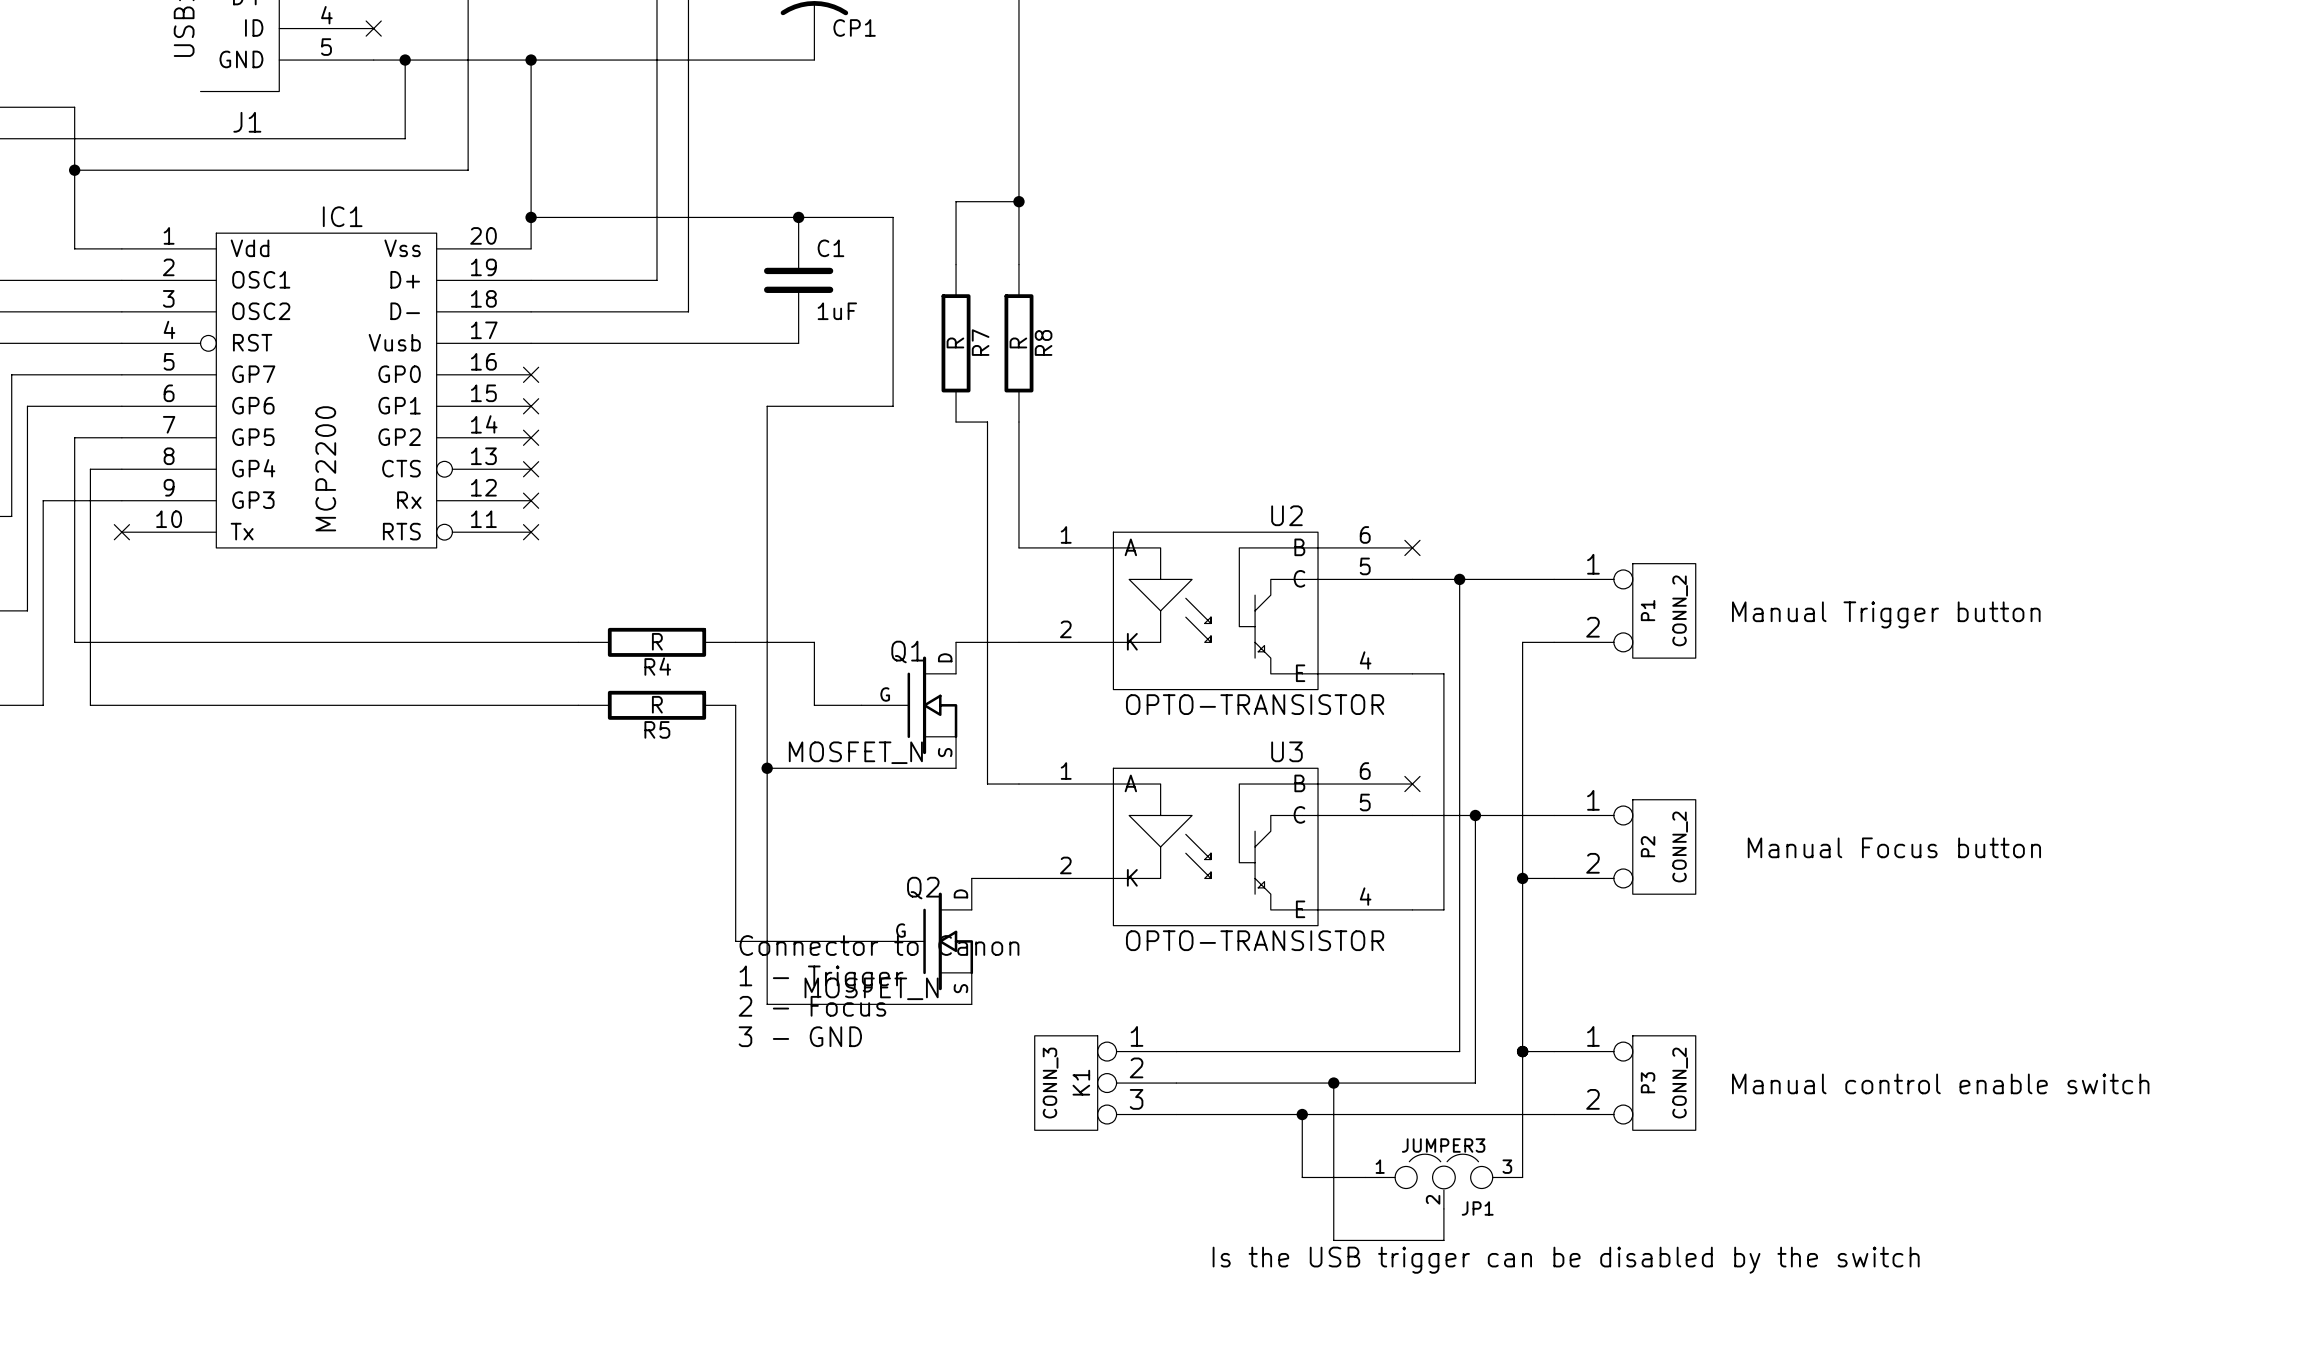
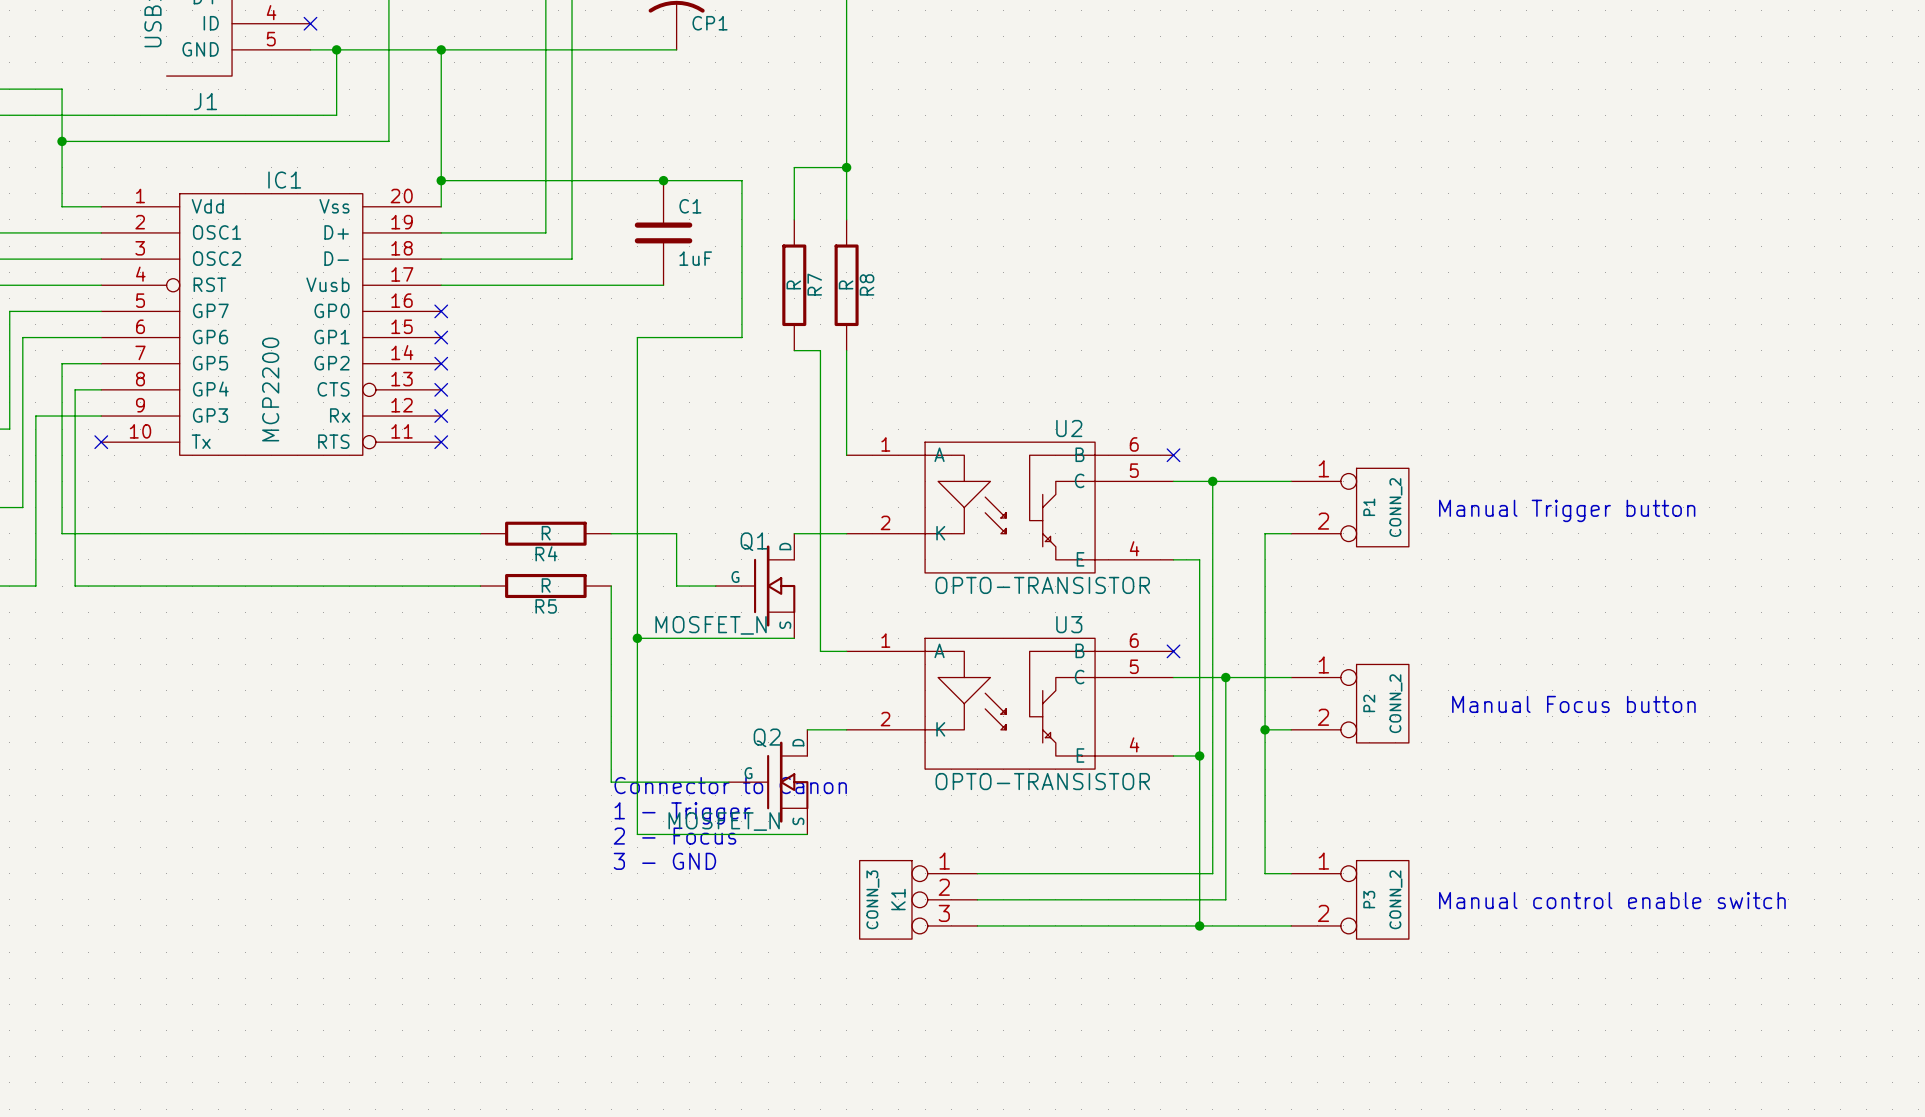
wire: none -> (1199, 755) (1199, 925)
junction: none -> (1199, 755)
wire: (1522, 1051) (1522, 1177) -> none
junction: (1522, 1051) -> none
wire: (1333, 1083) (1333, 1240) (1443, 1240) (1443, 1208) -> none
junction: (1333, 1083) -> none
wire: (1302, 1114) (1302, 1177) (1365, 1177) -> none
junction: (1302, 1114) -> none
junction: none -> (1199, 925)
JP1: JUMPER3 (1443, 1181) -> none
text: Is the USB trigger can be disabled by the switch (1566, 1260) -> none

